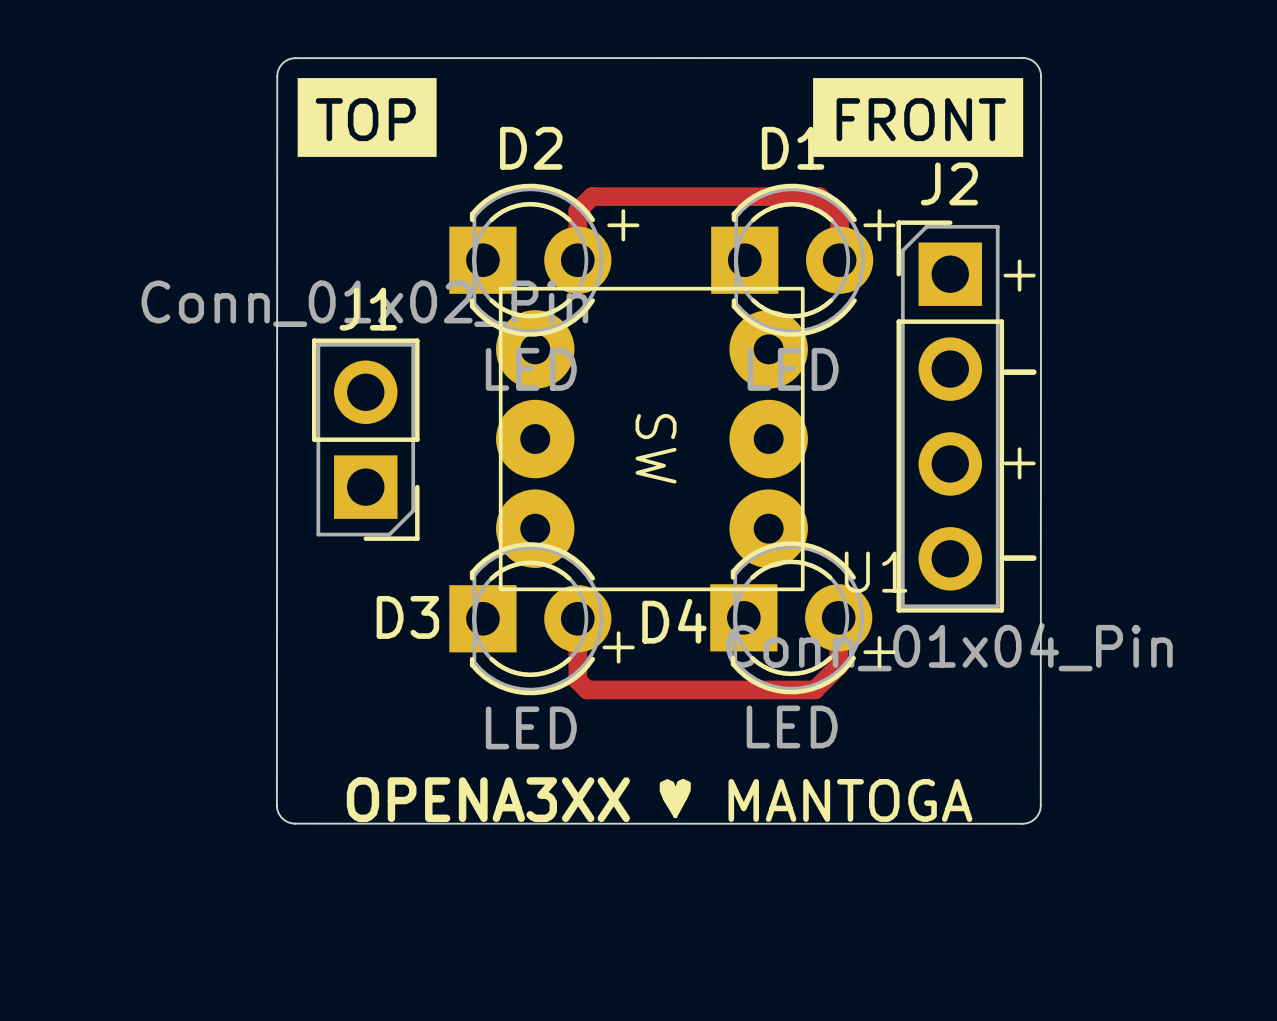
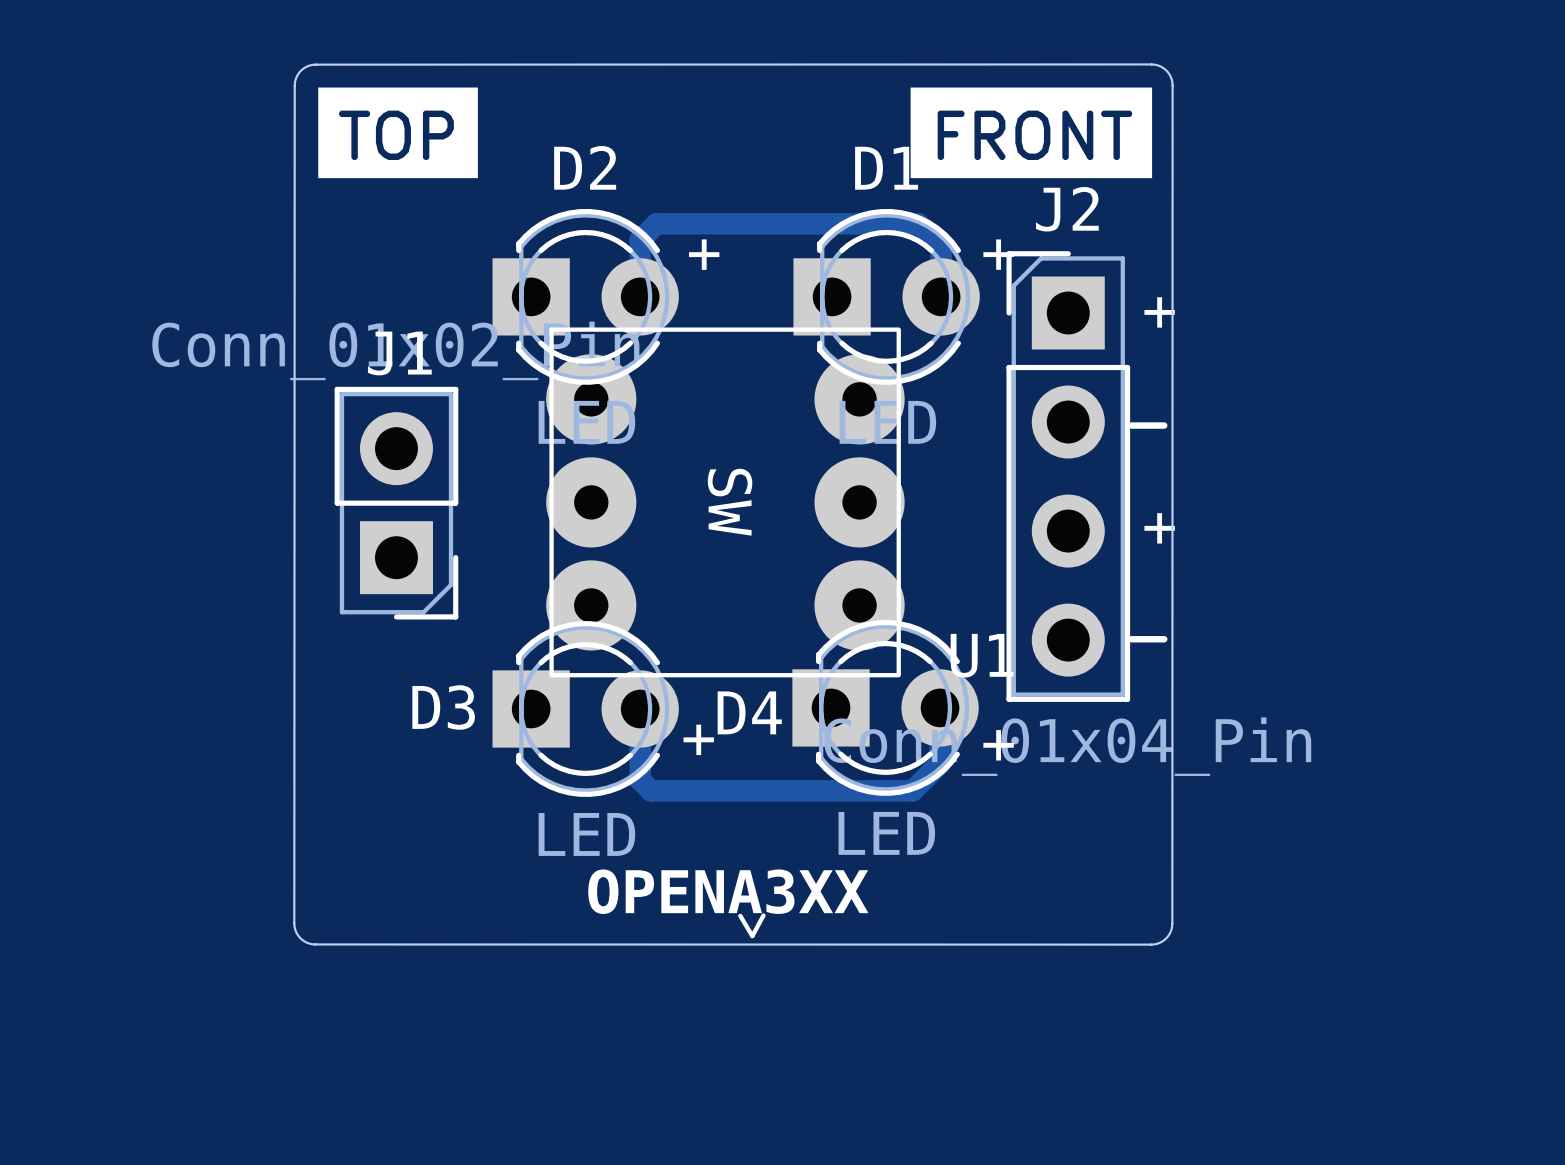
drawing: [659, 778, 691, 817] -> none
text position: OPENA3XX (488, 799) -> OPENA3XX (728, 891)
text: MANTOGA (850, 800) -> none

